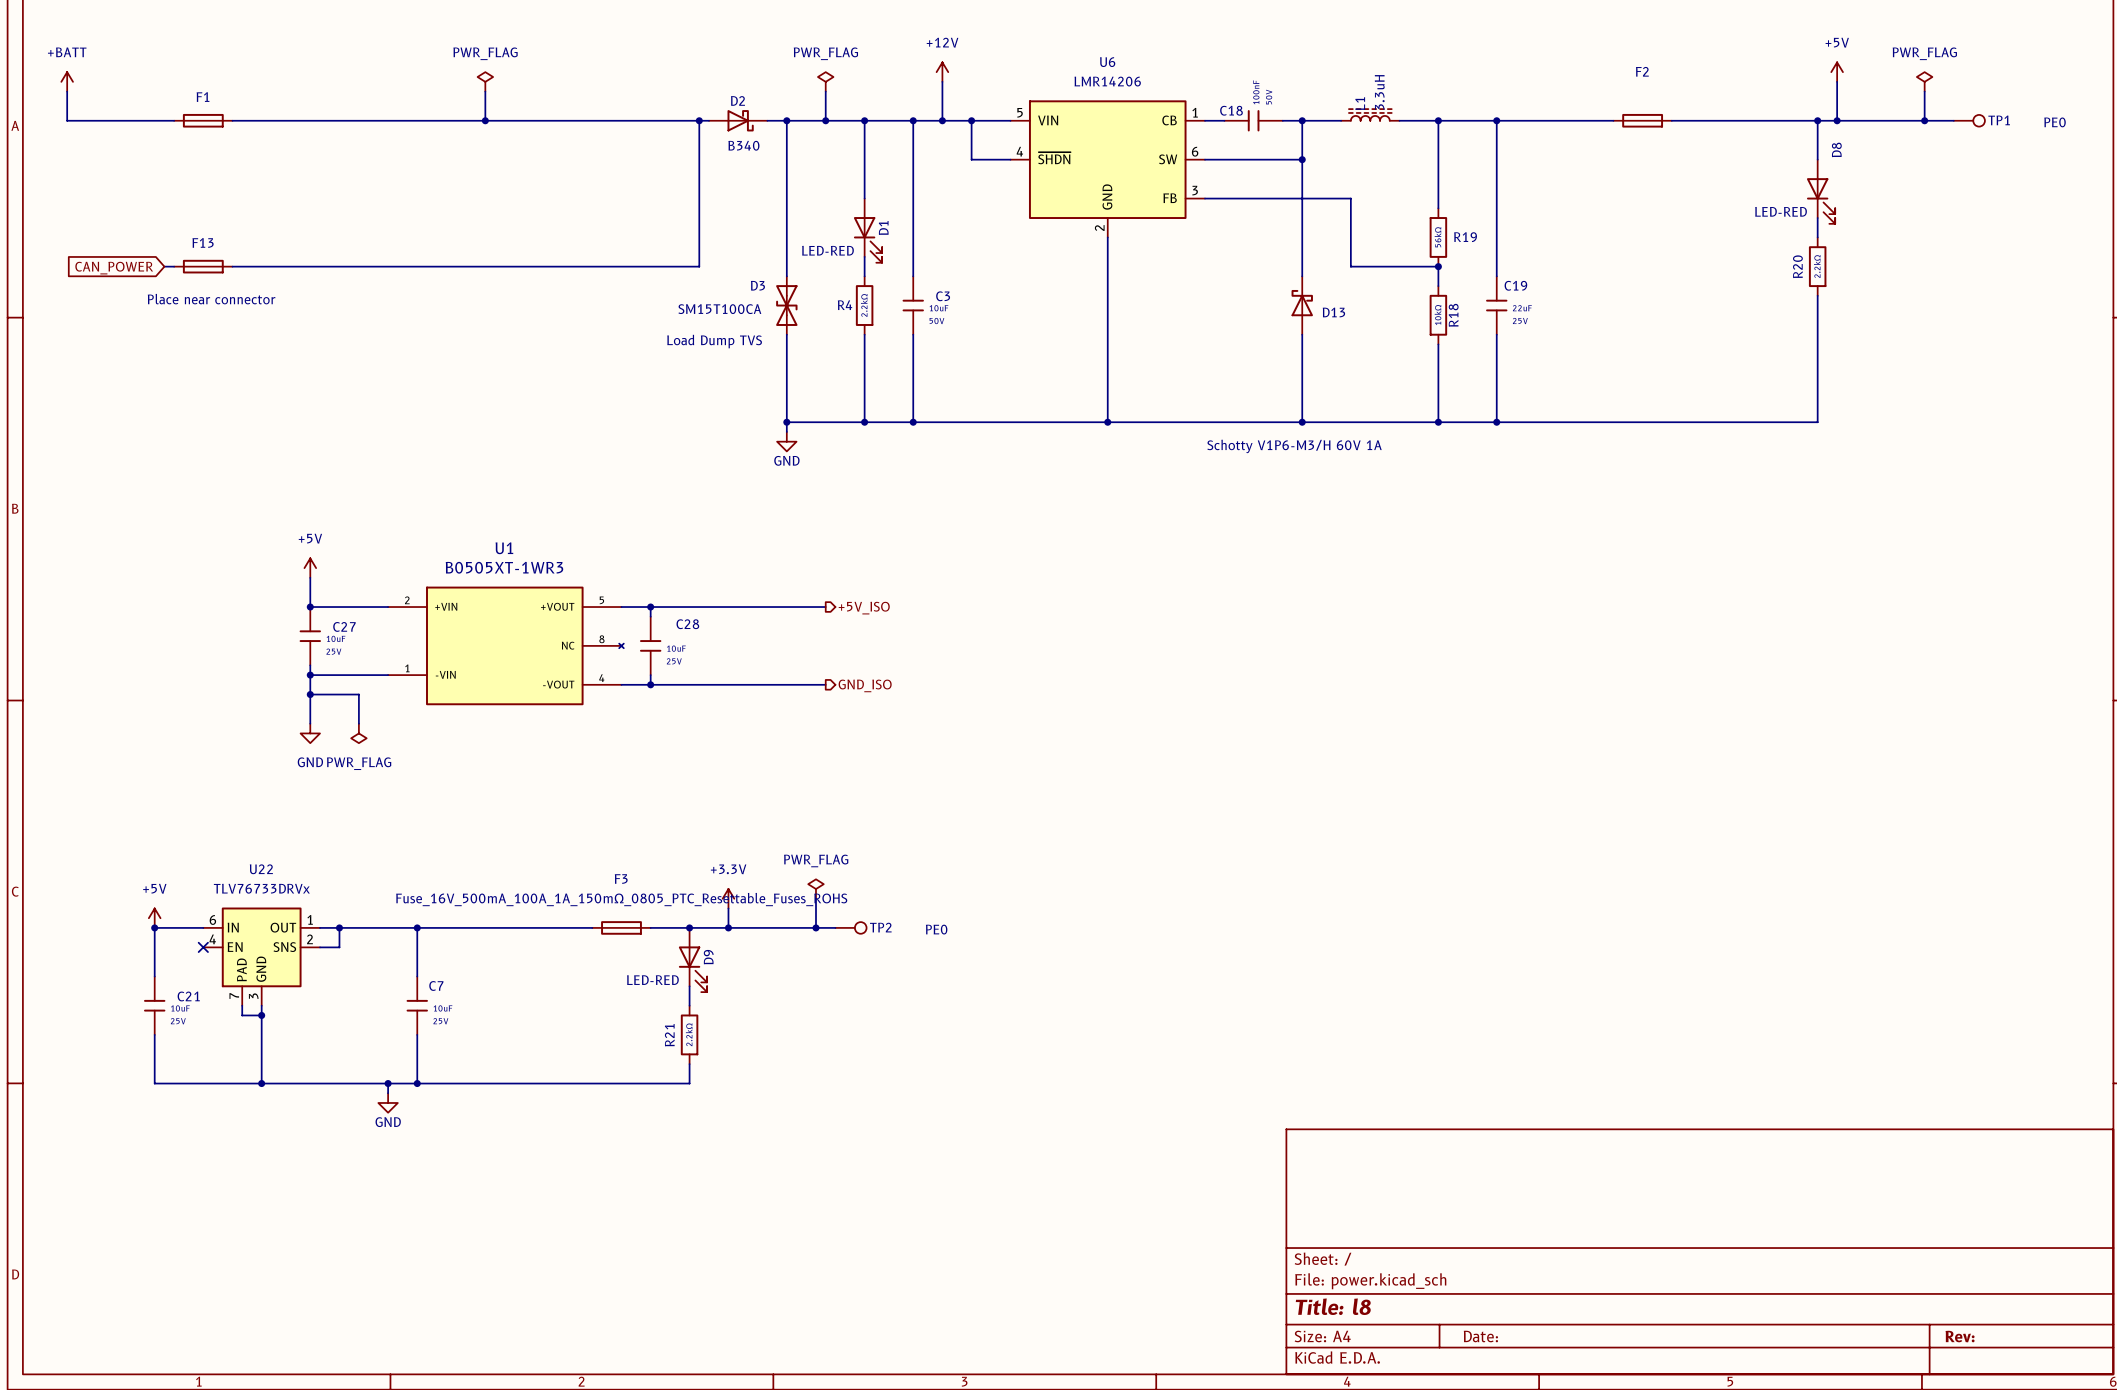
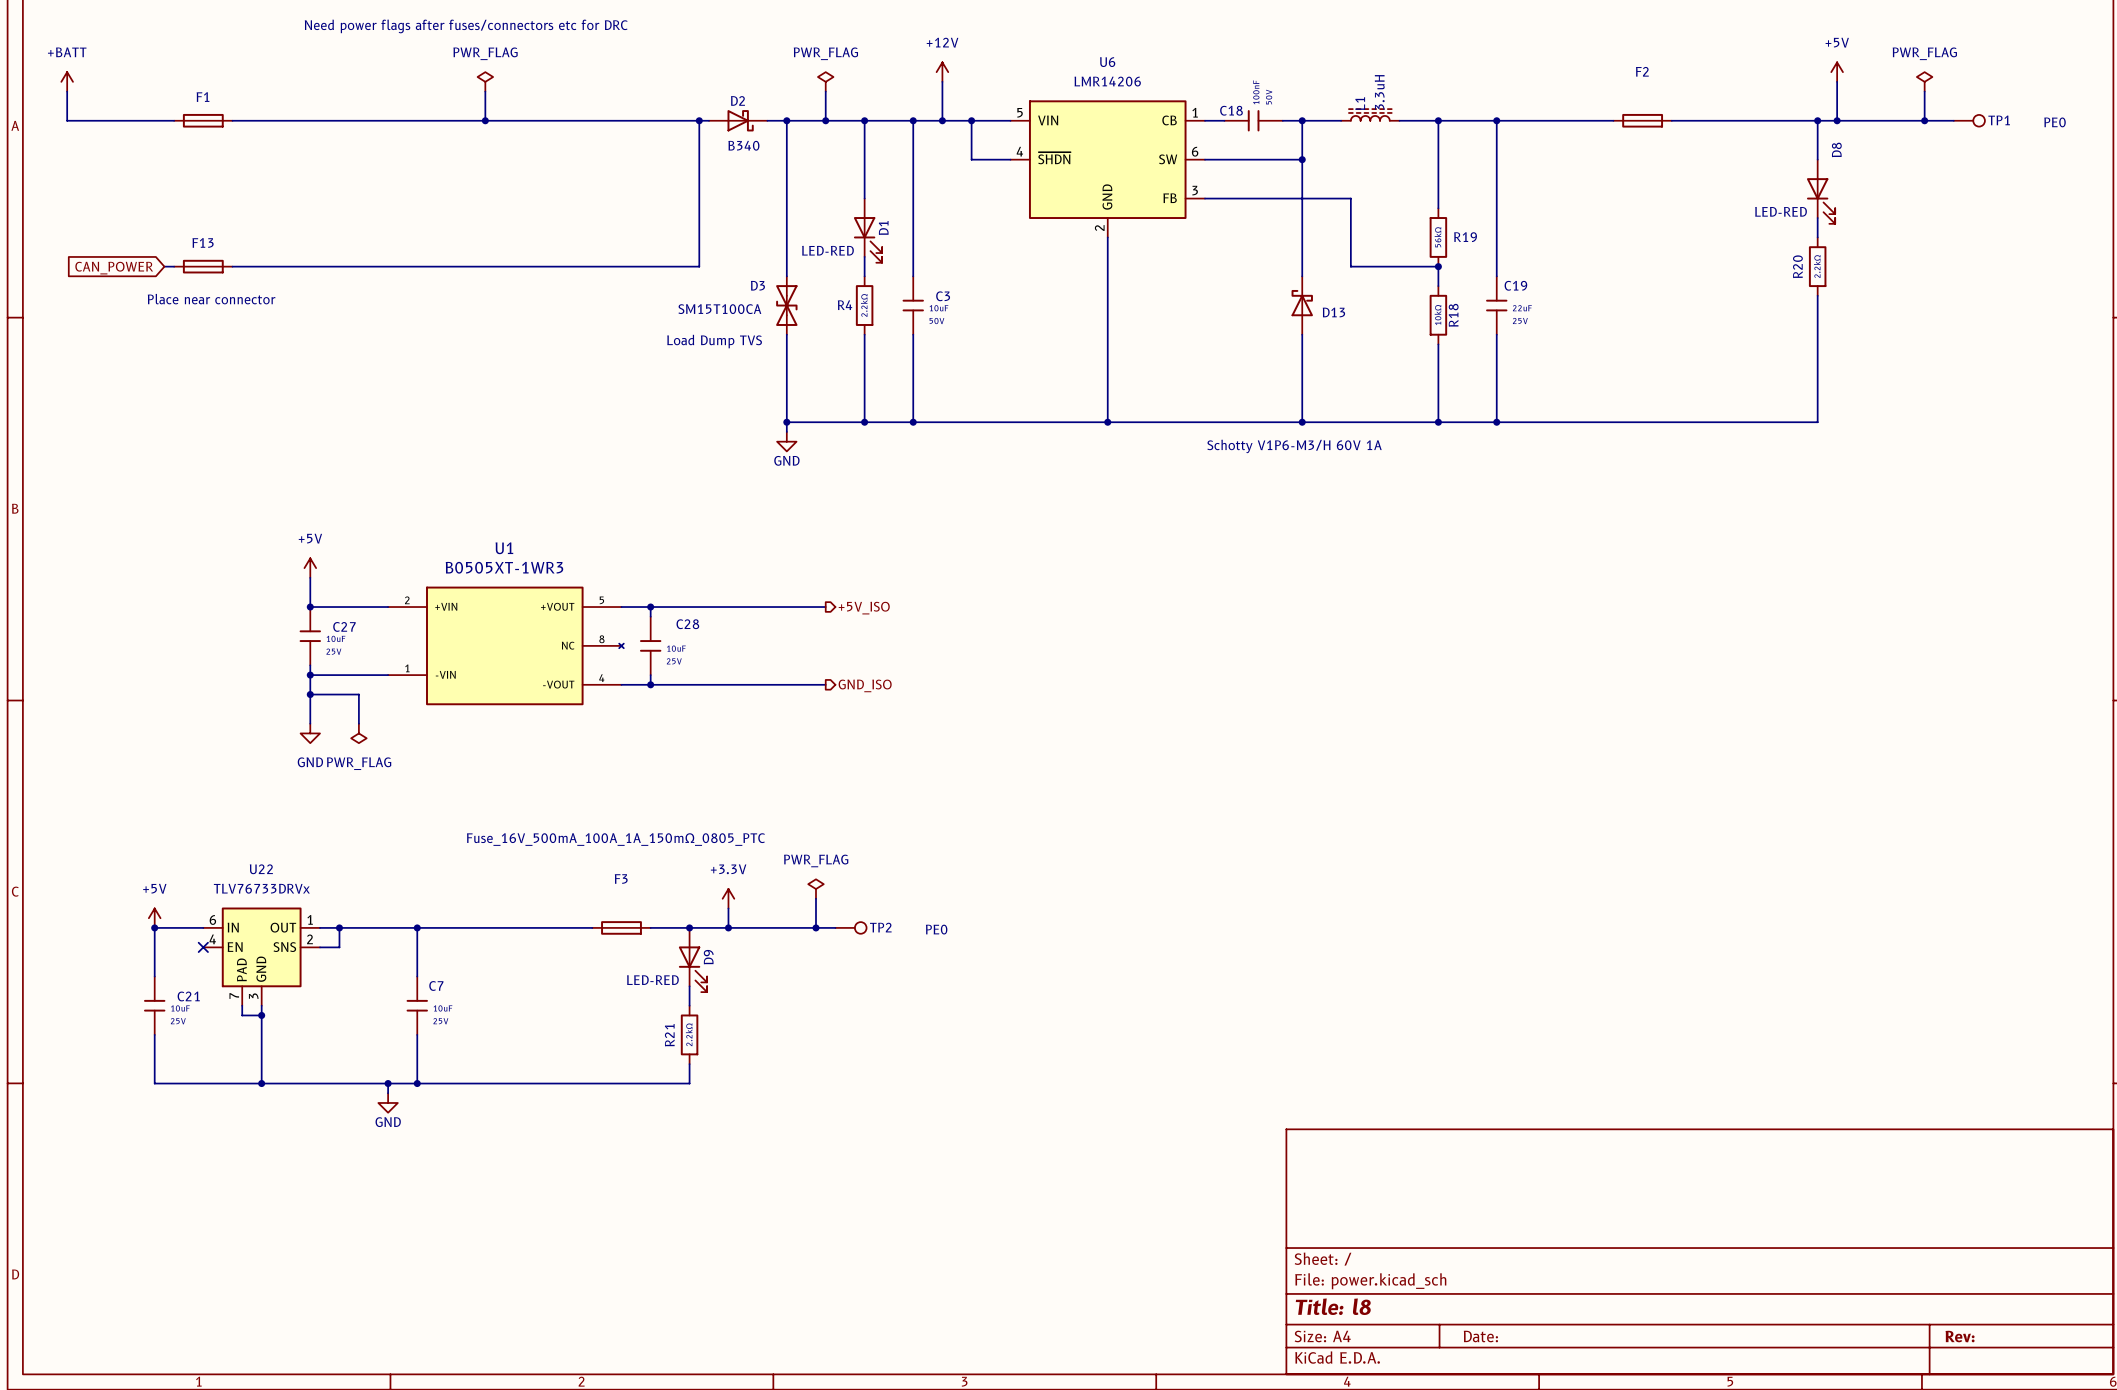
text: none -> Need power flags after fuses/connectors etc for DRC (466, 26)
F3 value: Fuse_16V_500mA_100A_1A_150mΩ_0805_PTC_Resettable_Fuses_ROHS (621, 899) -> Fuse_16V_500mA_100A_1A_150mΩ_0805_PTC (615, 839)

